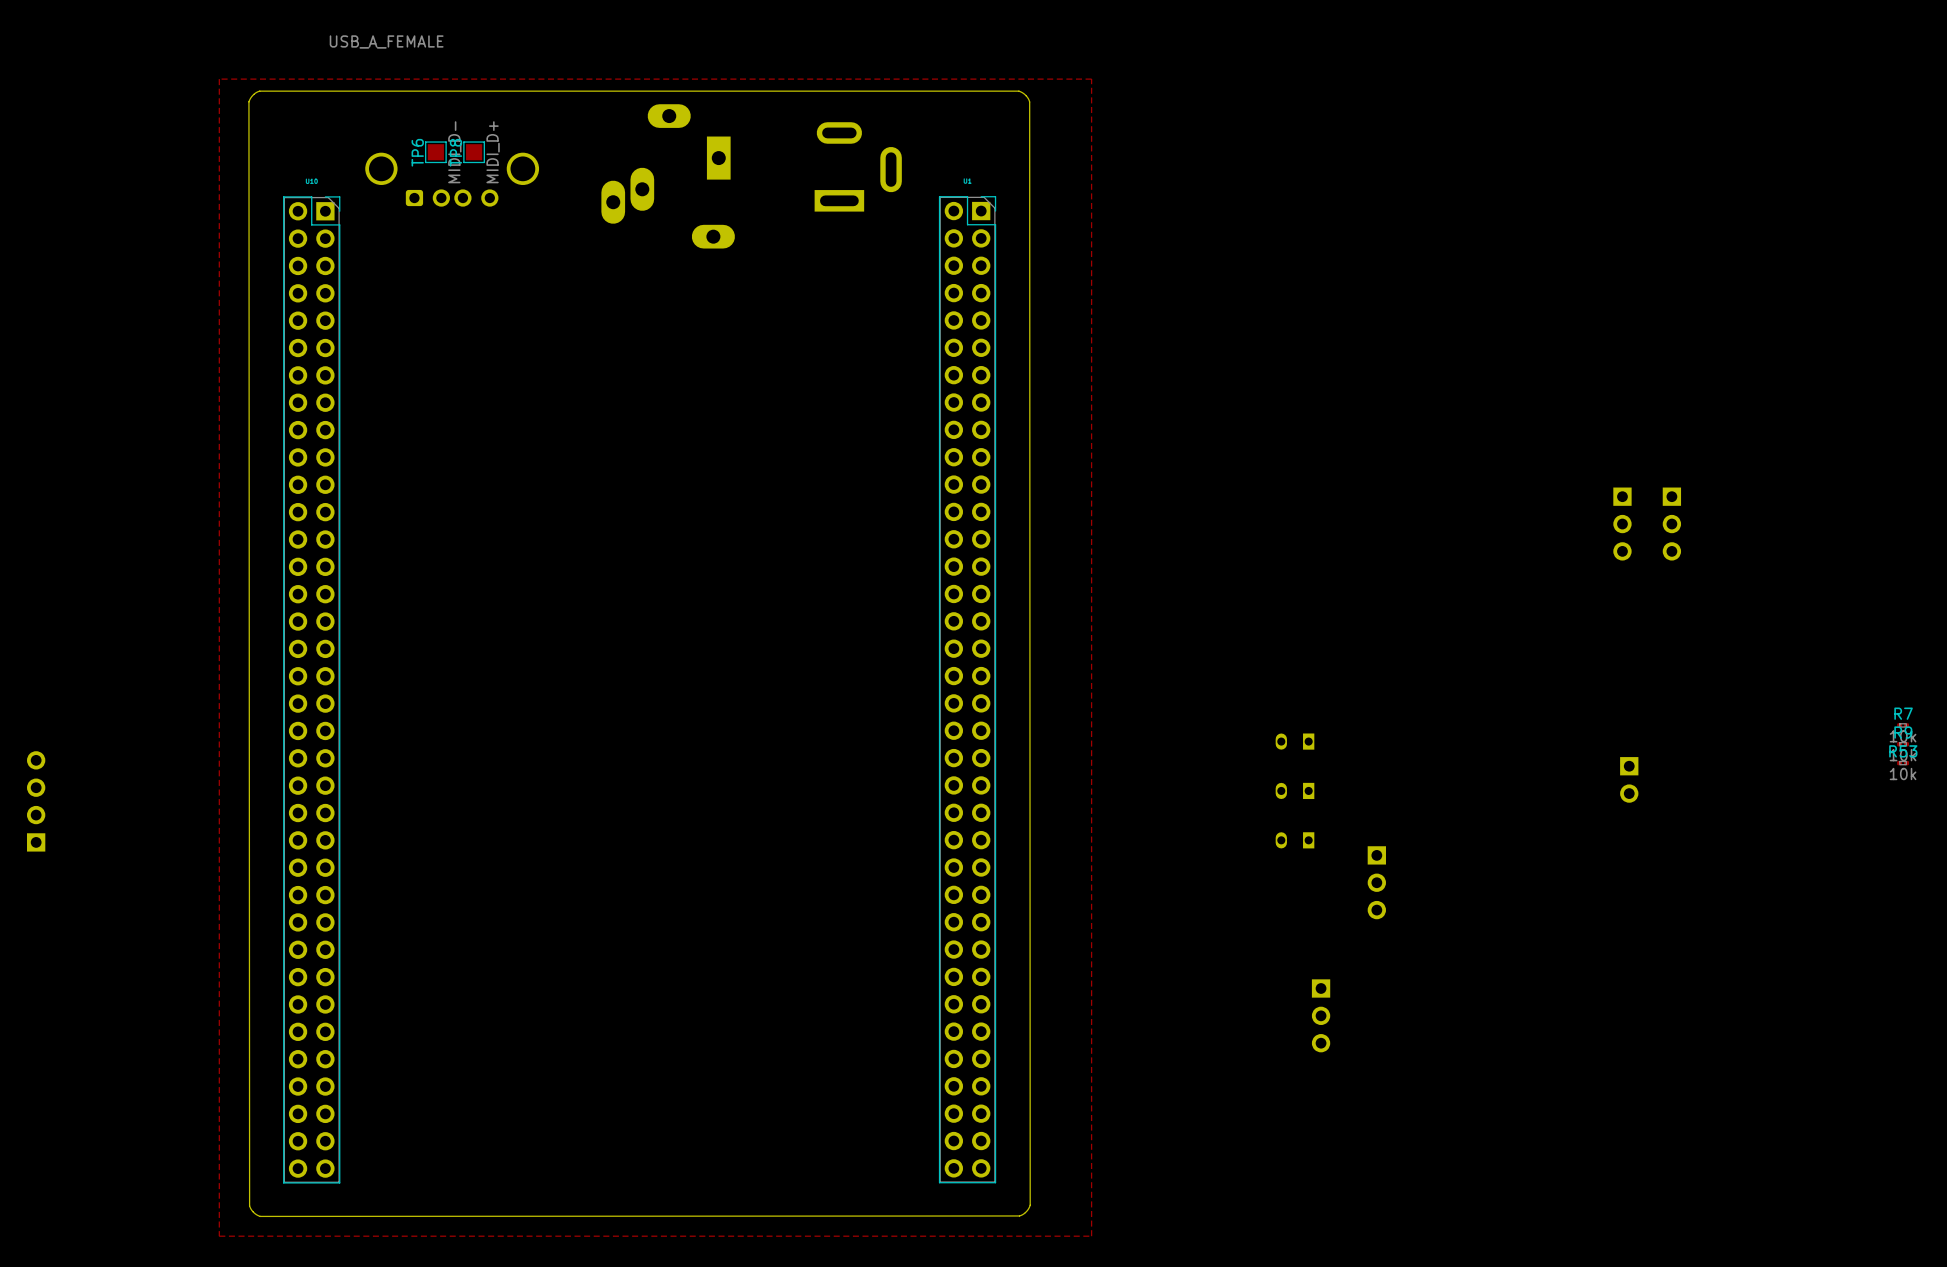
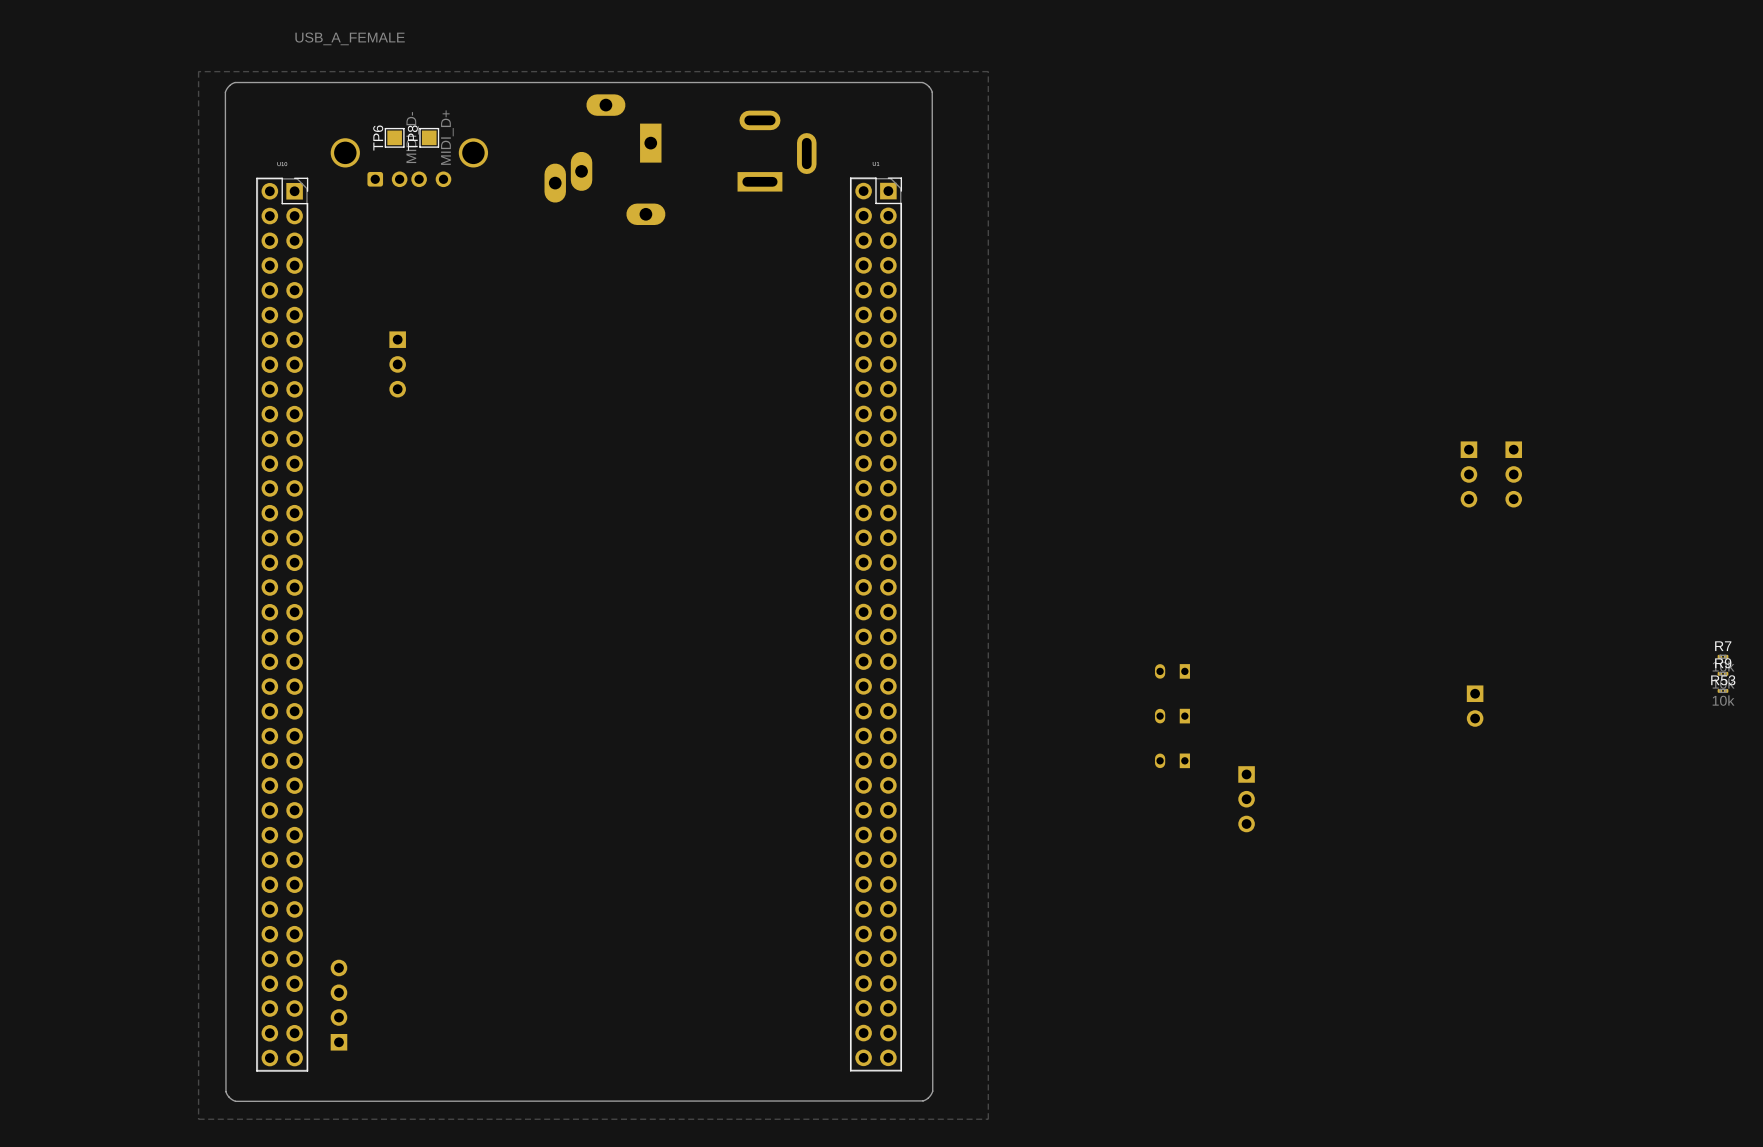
part: none -> (397, 364)
part: (36, 801) -> none
part: (1321, 1015) -> none
part: none -> (338, 1005)

